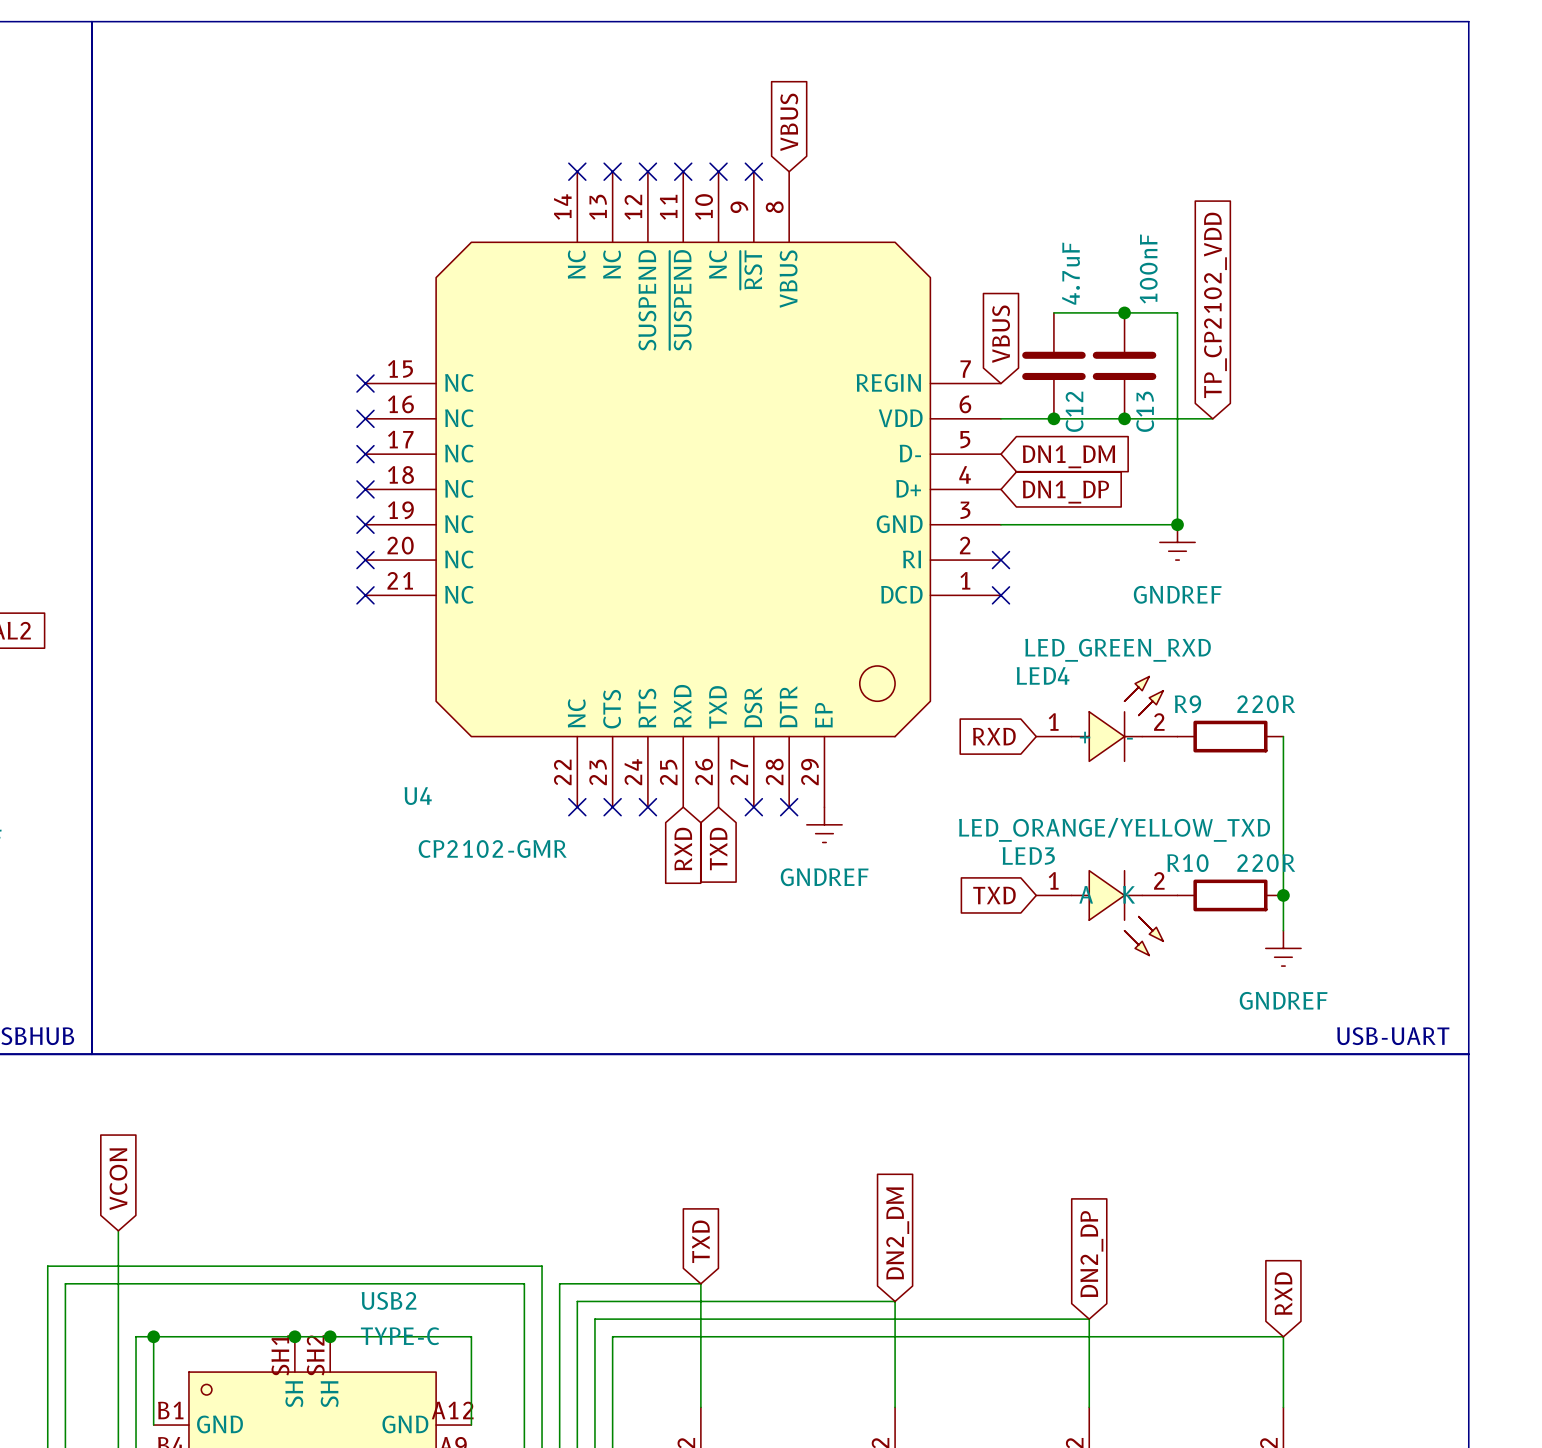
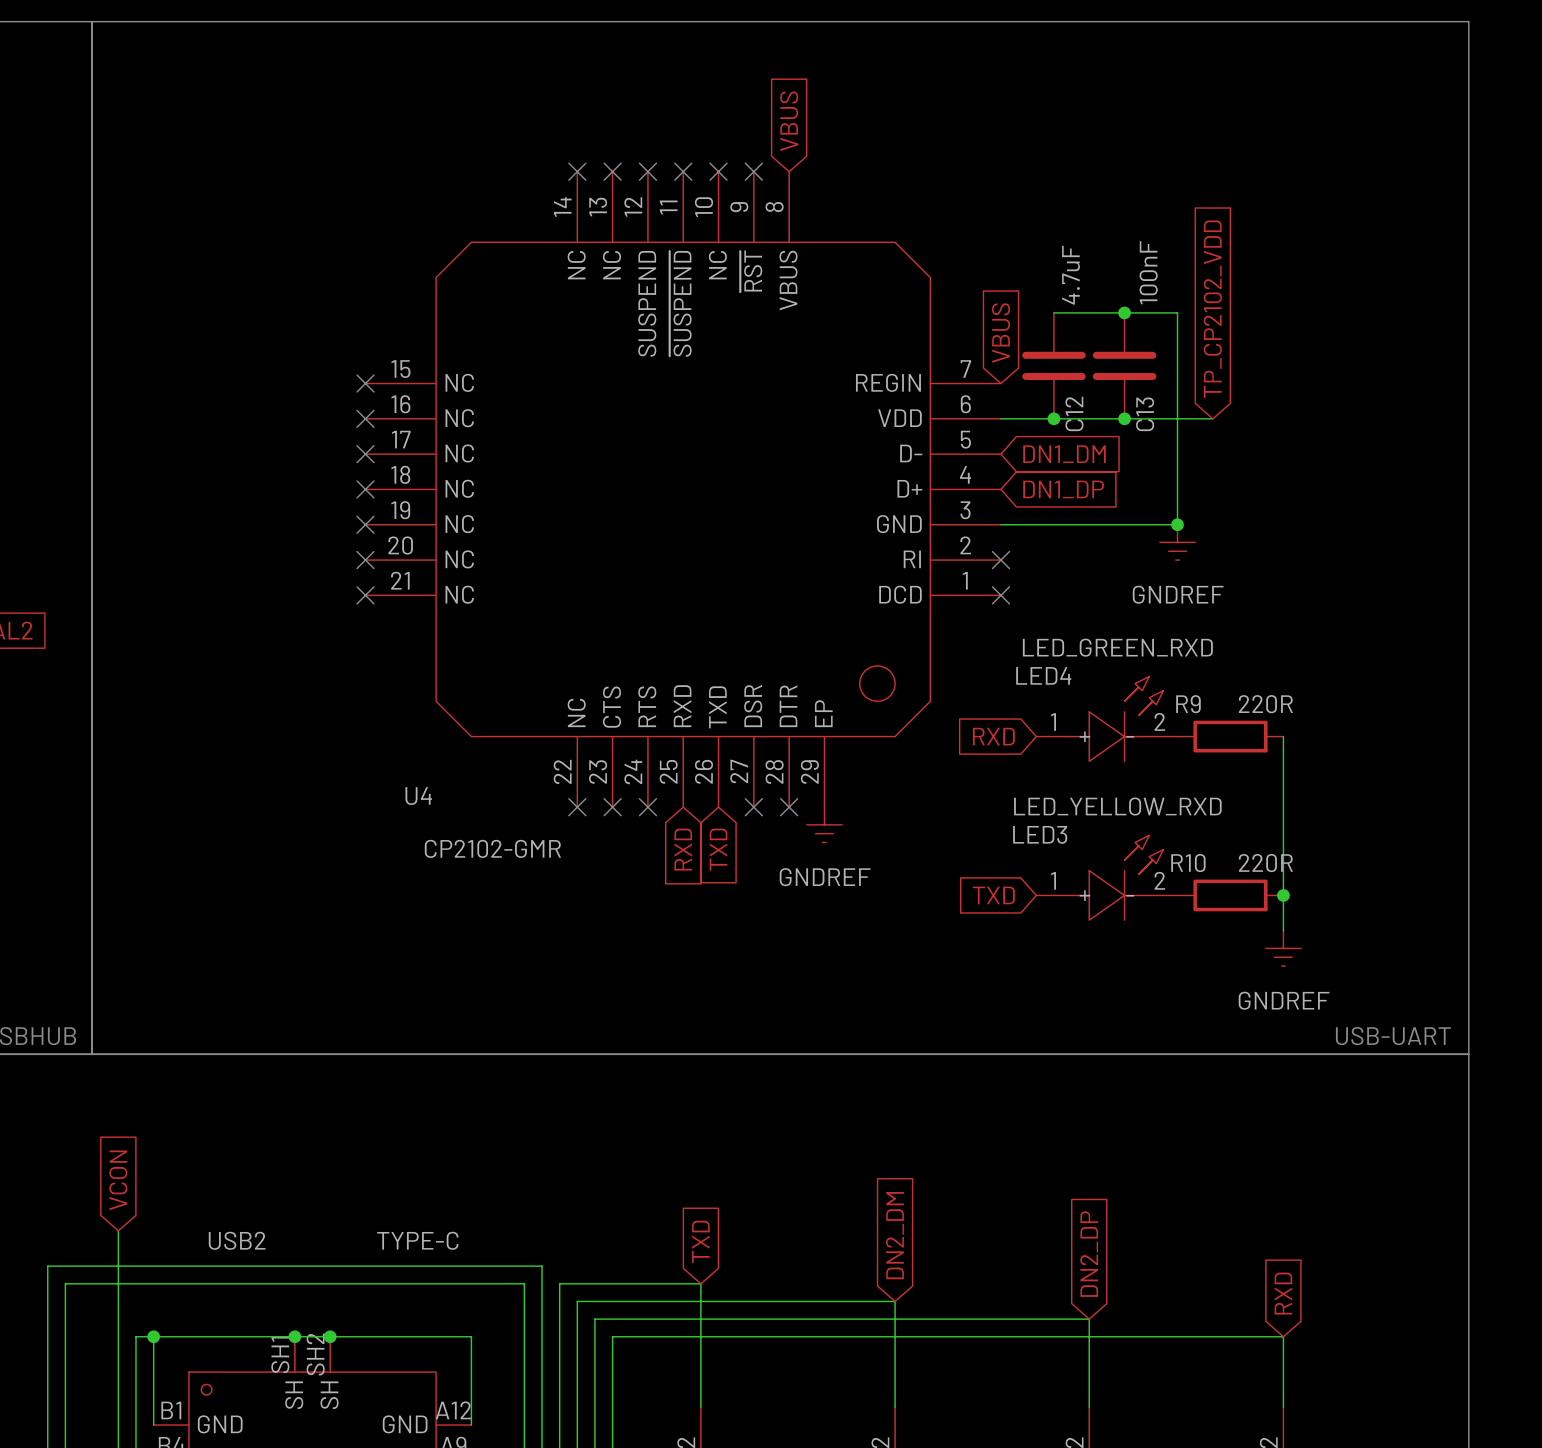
LED3 value: LED_ORANGE/YELLOW_TXD (1114, 829) -> LED_YELLOW_RXD (1117, 806)
LED3 symbol: [1036, 870, 1178, 956] -> [1036, 835, 1178, 921]
USB2 name position: USB2 (389, 1300) -> USB2 (237, 1240)
USB2 value position: TYPE-C (400, 1336) -> TYPE-C (417, 1240)

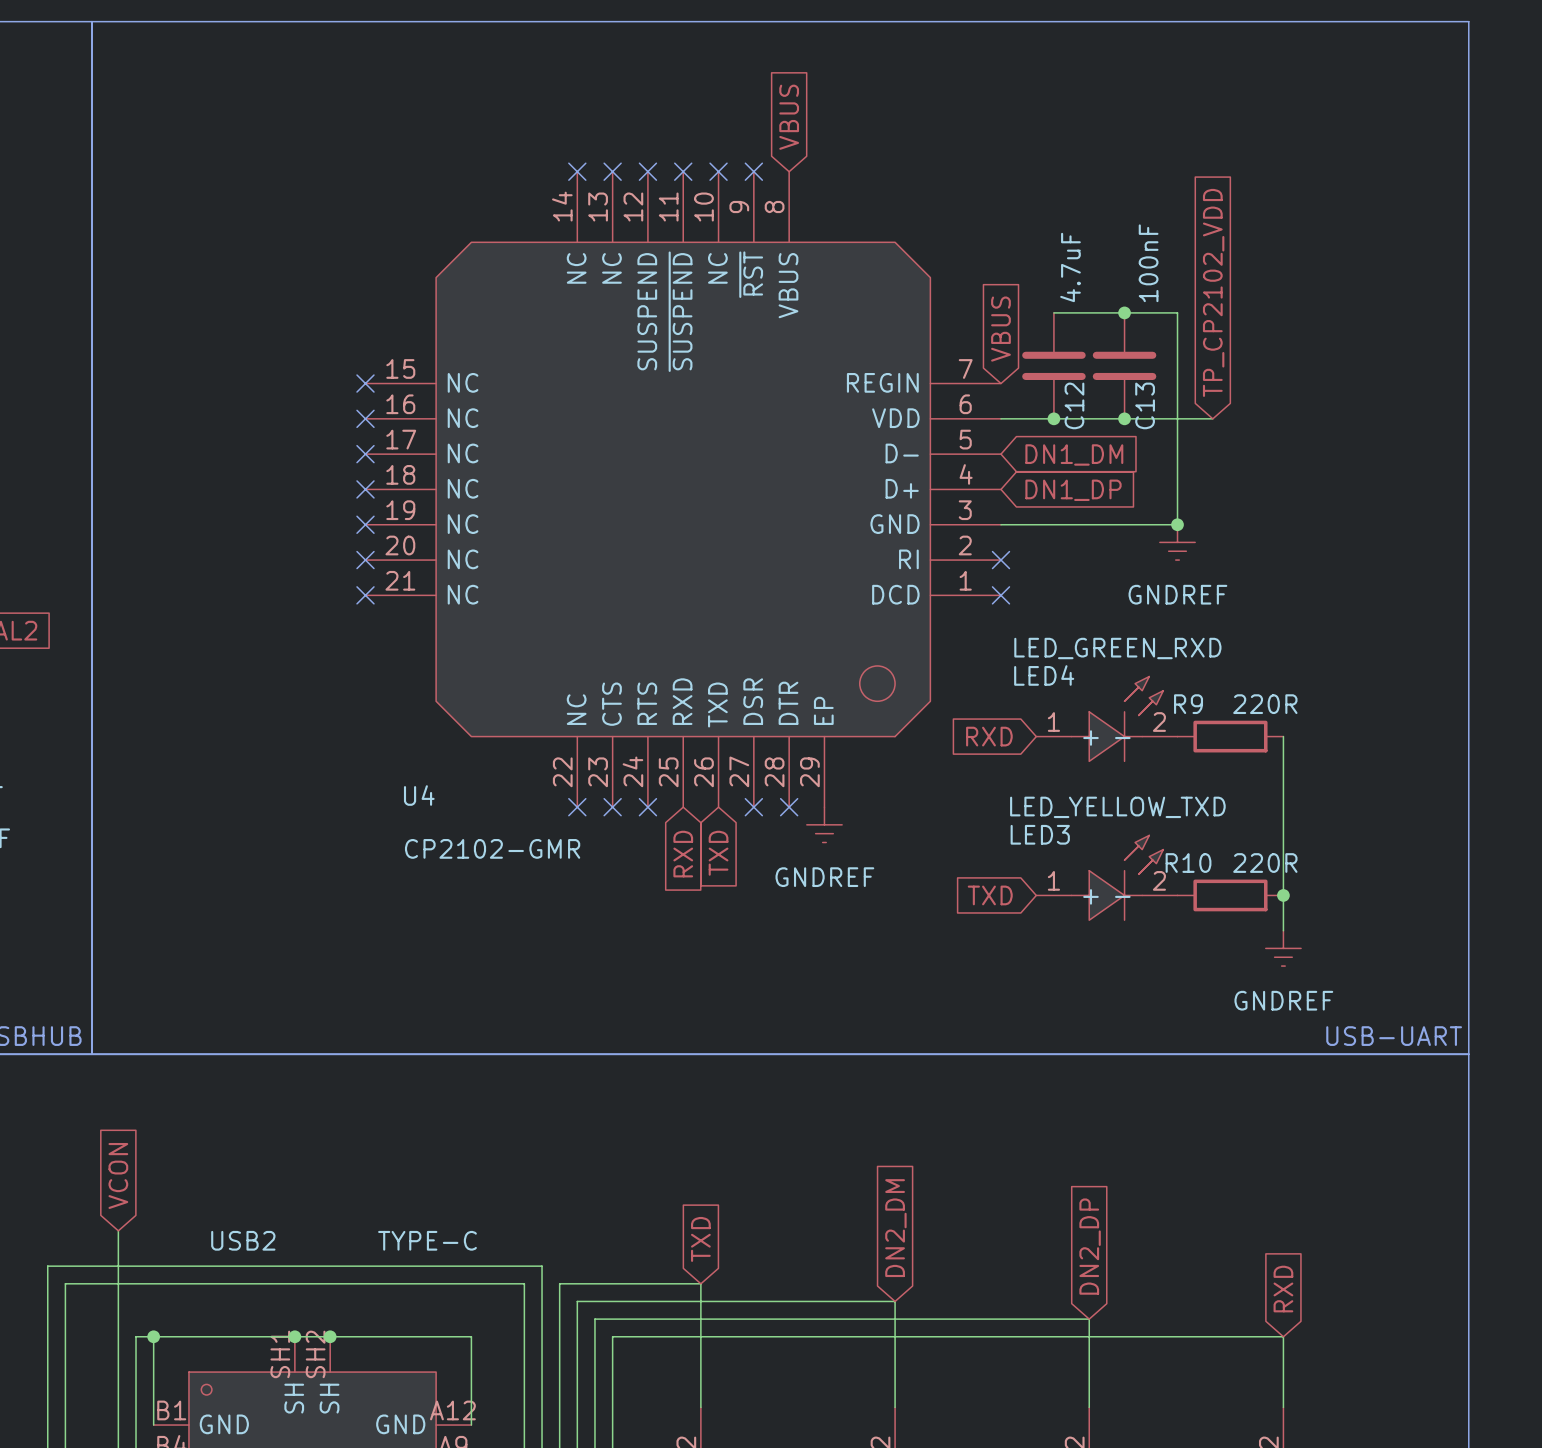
LED3 value: LED_YELLOW_RXD (1117, 806) -> LED_YELLOW_TXD (1117, 807)

